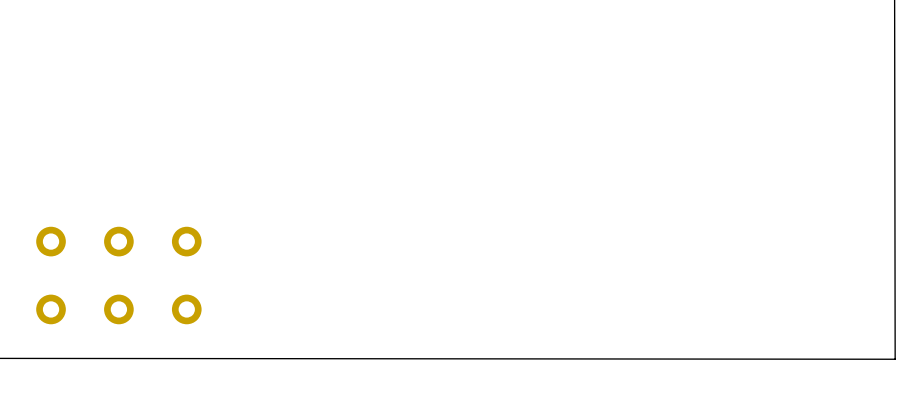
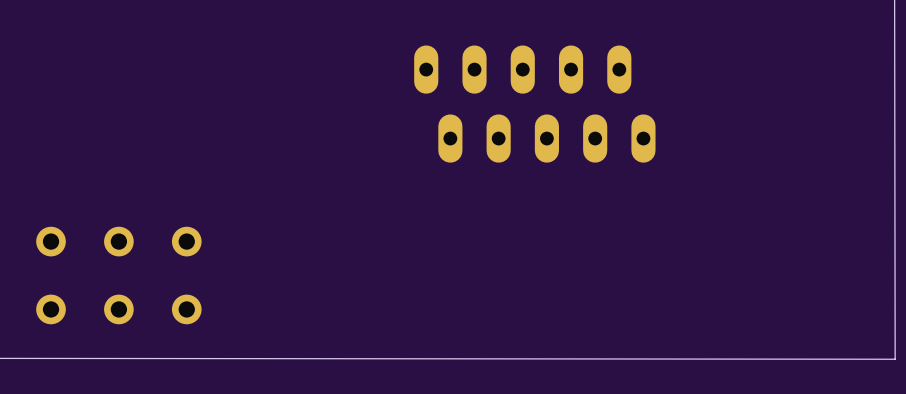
part: none -> (534, 104)

